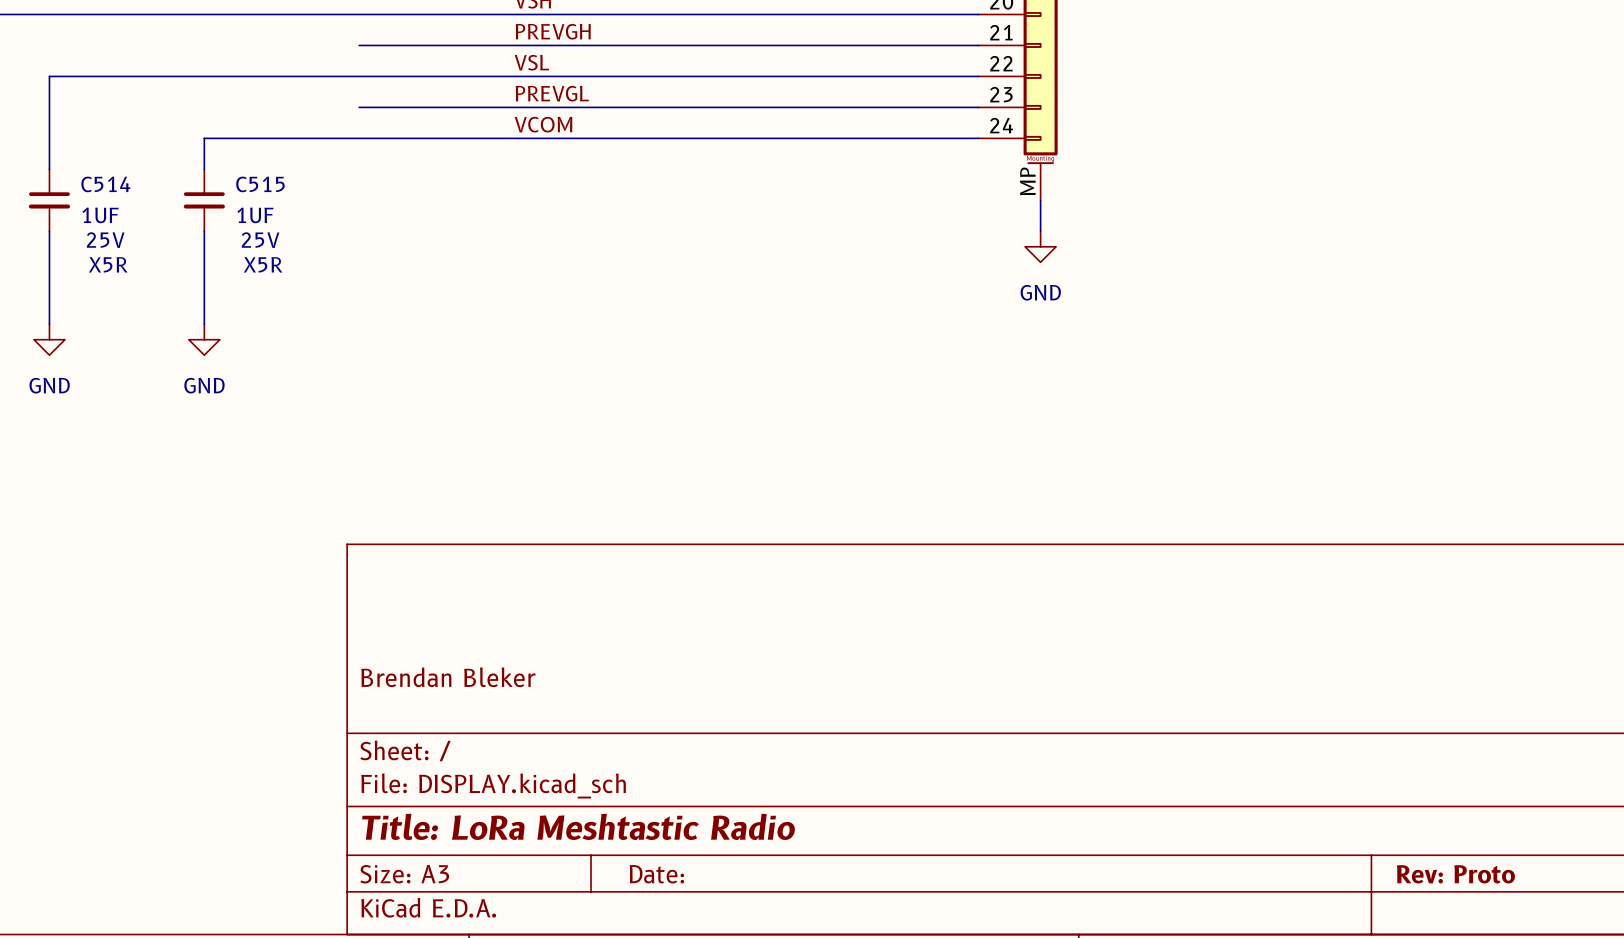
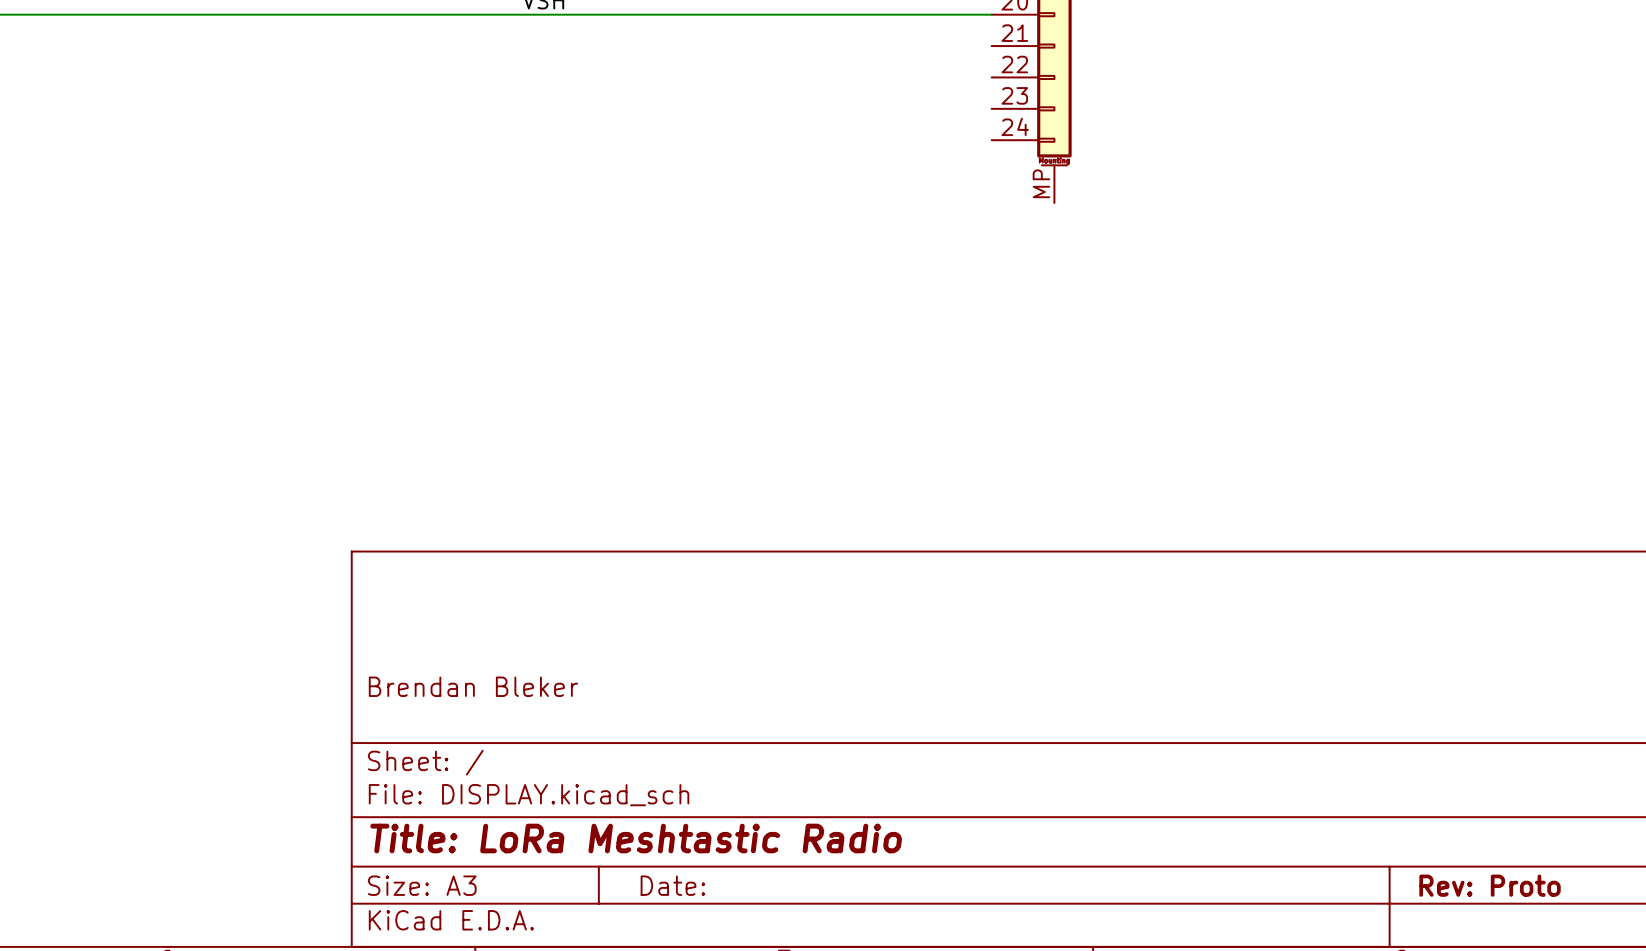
label: PREVGH (553, 31) -> none
wire: (359, 45) (978, 45) -> none
label: VSL (531, 62) -> none
wire: (978, 76) (49, 76) (49, 169) -> none
label: PREVGL (552, 93) -> none
wire: (359, 107) (978, 107) -> none
label: VCOM (543, 124) -> none
wire: (978, 138) (204, 138) (204, 169) -> none
C514: 1UF (49, 200) -> none
C515: 1UF (204, 200) -> none
wire: (1040, 200) (1040, 231) -> none
wire: (49, 231) (49, 324) -> none
wire: (204, 231) (204, 324) -> none
power symbol: GND (1040, 246) -> none
power symbol: GND (49, 339) -> none
power symbol: GND (204, 339) -> none

